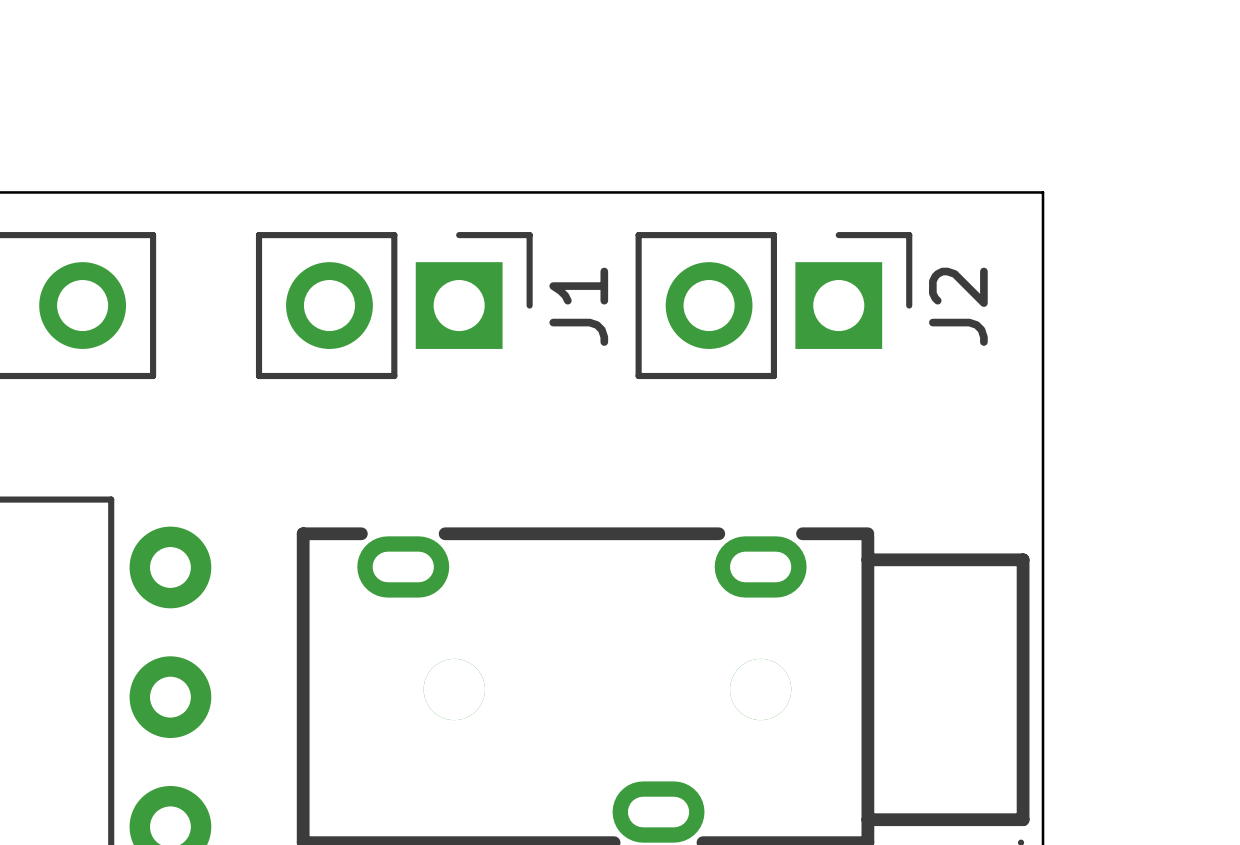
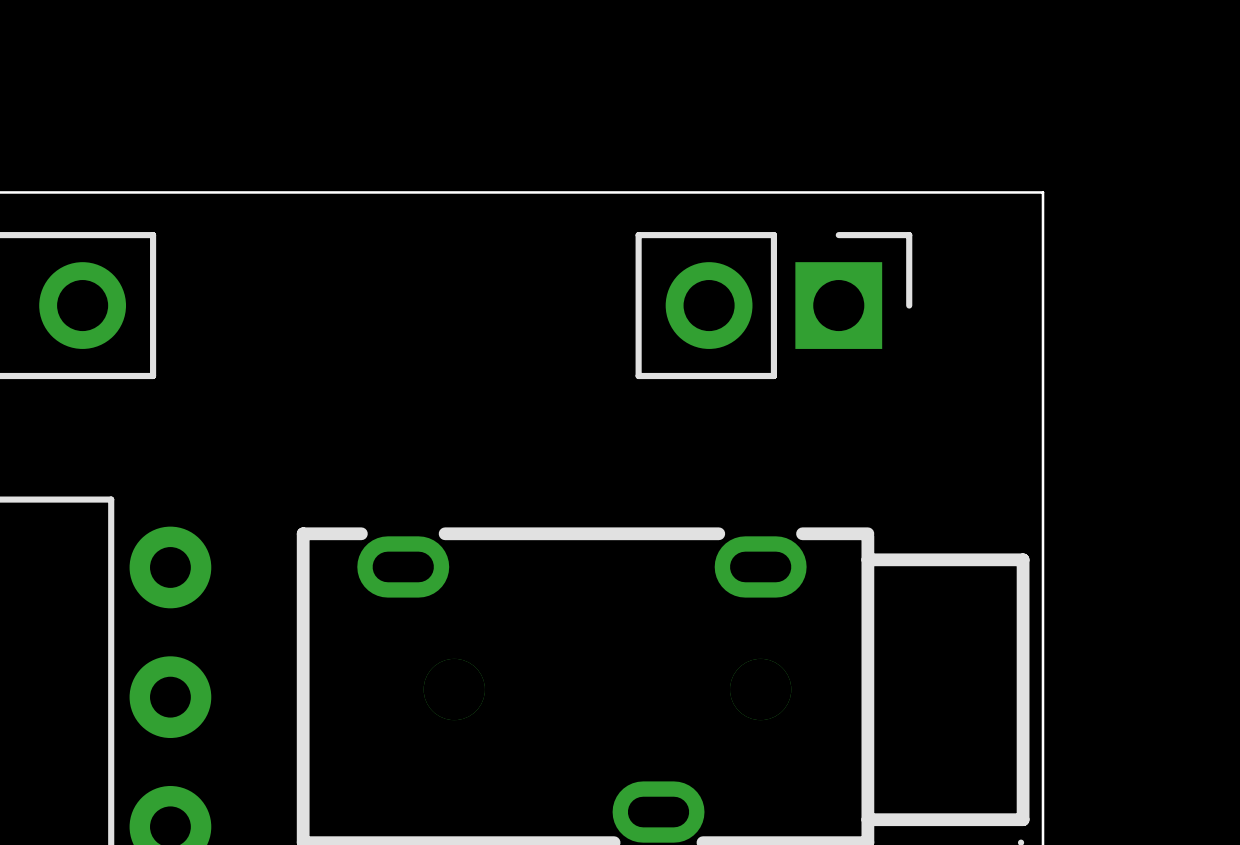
J1: (394, 305) -> none
J2 name: J2 (958, 306) -> none

